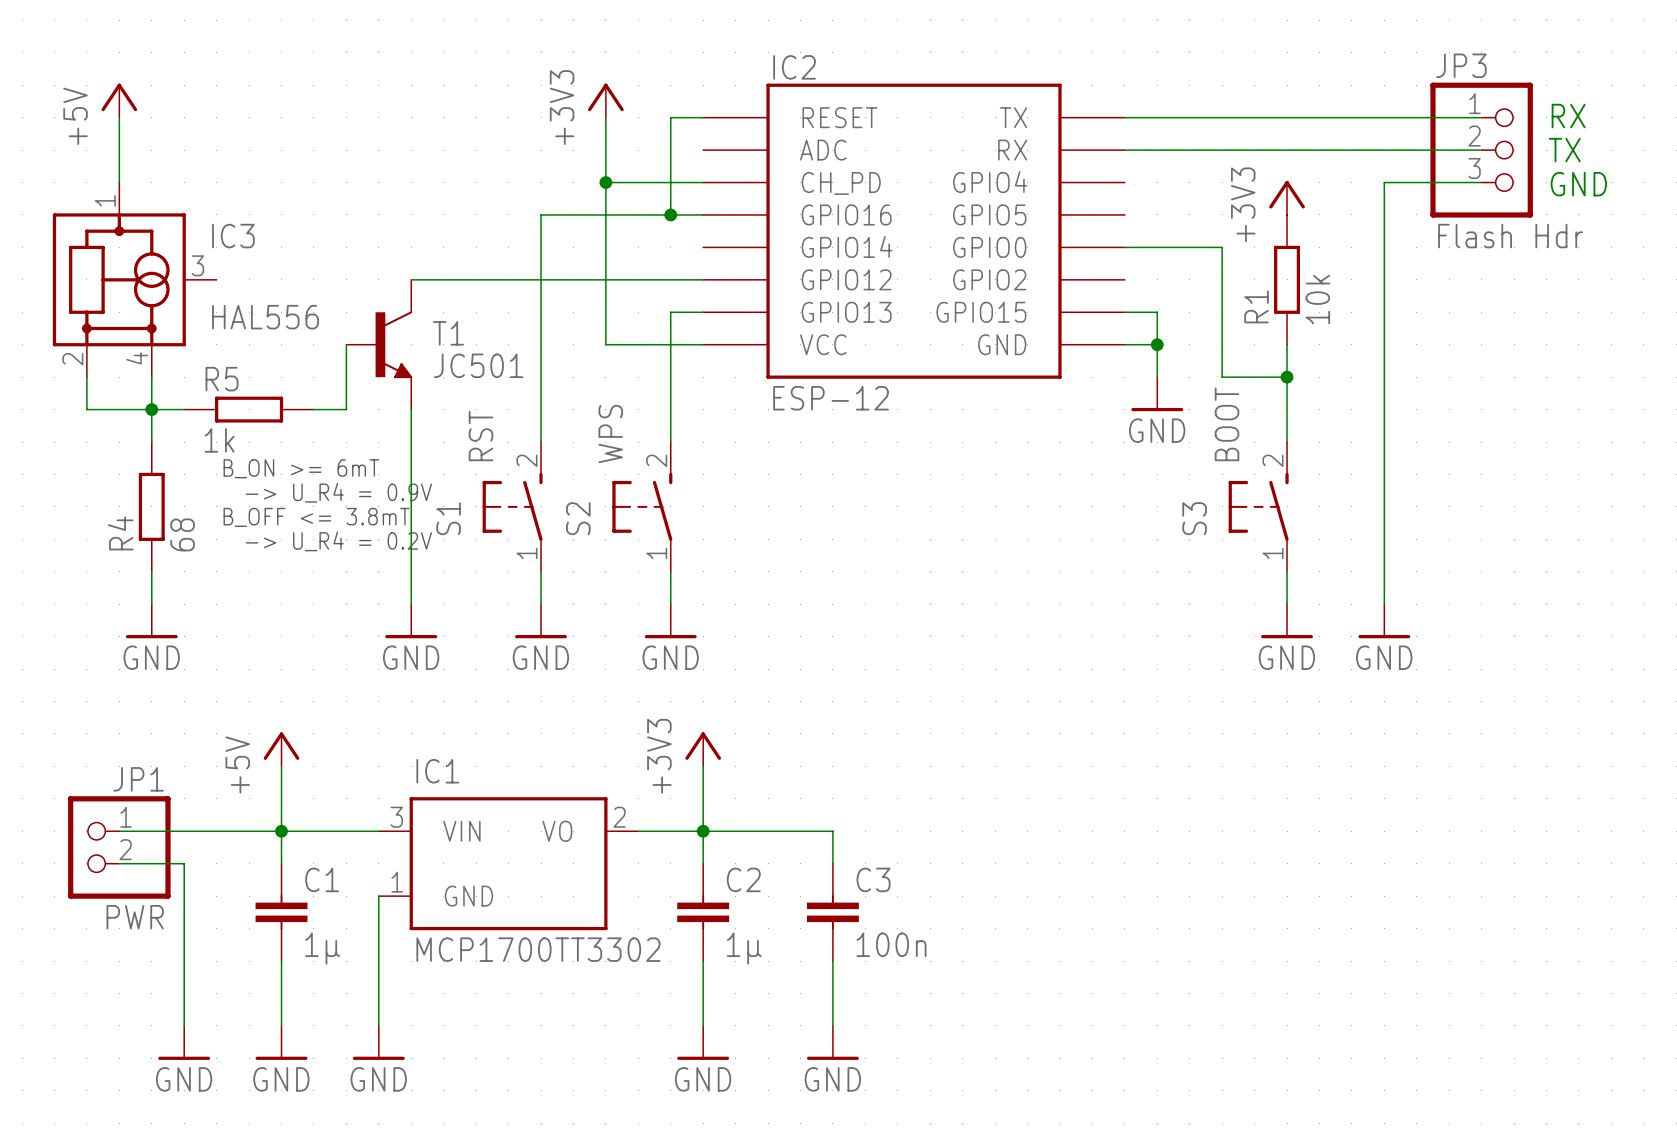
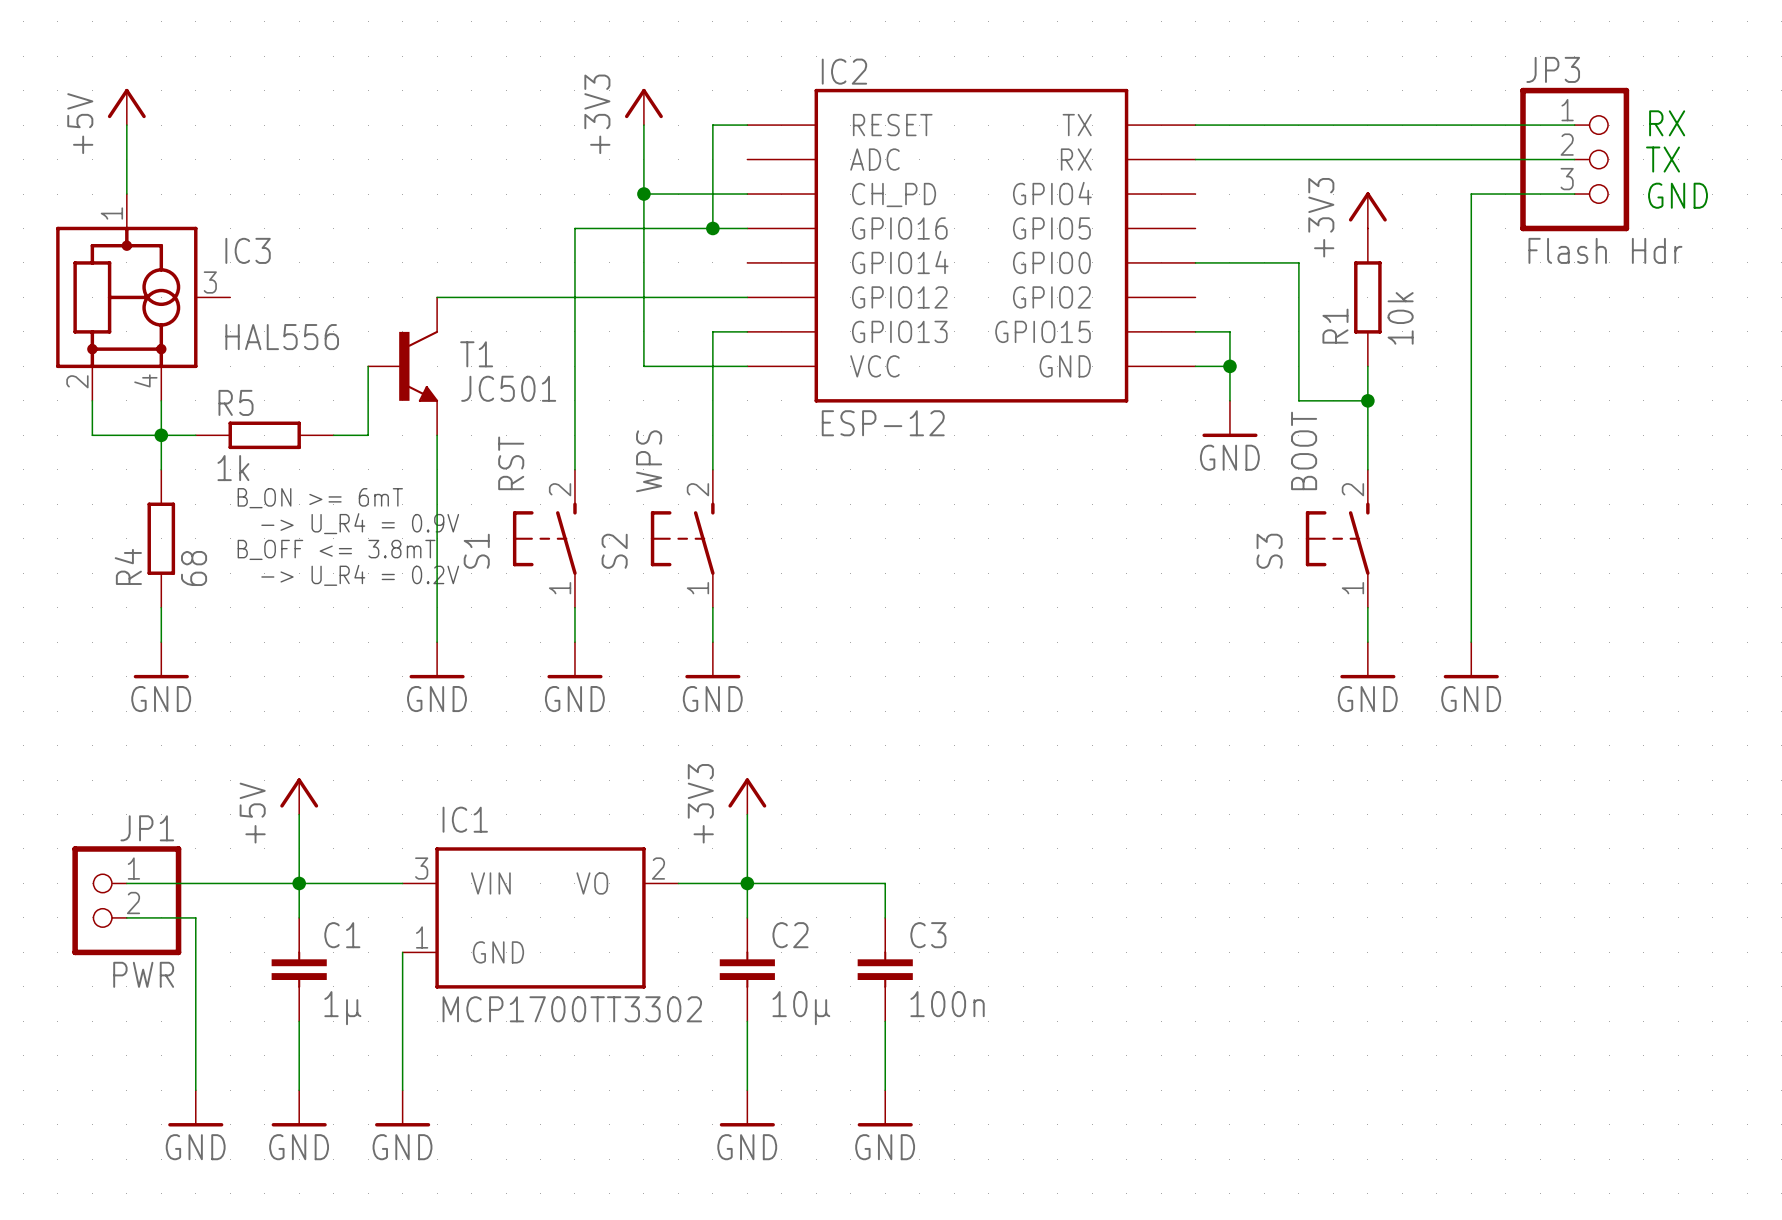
C2 value: 1µ (744, 948) -> 10µ (801, 1008)

